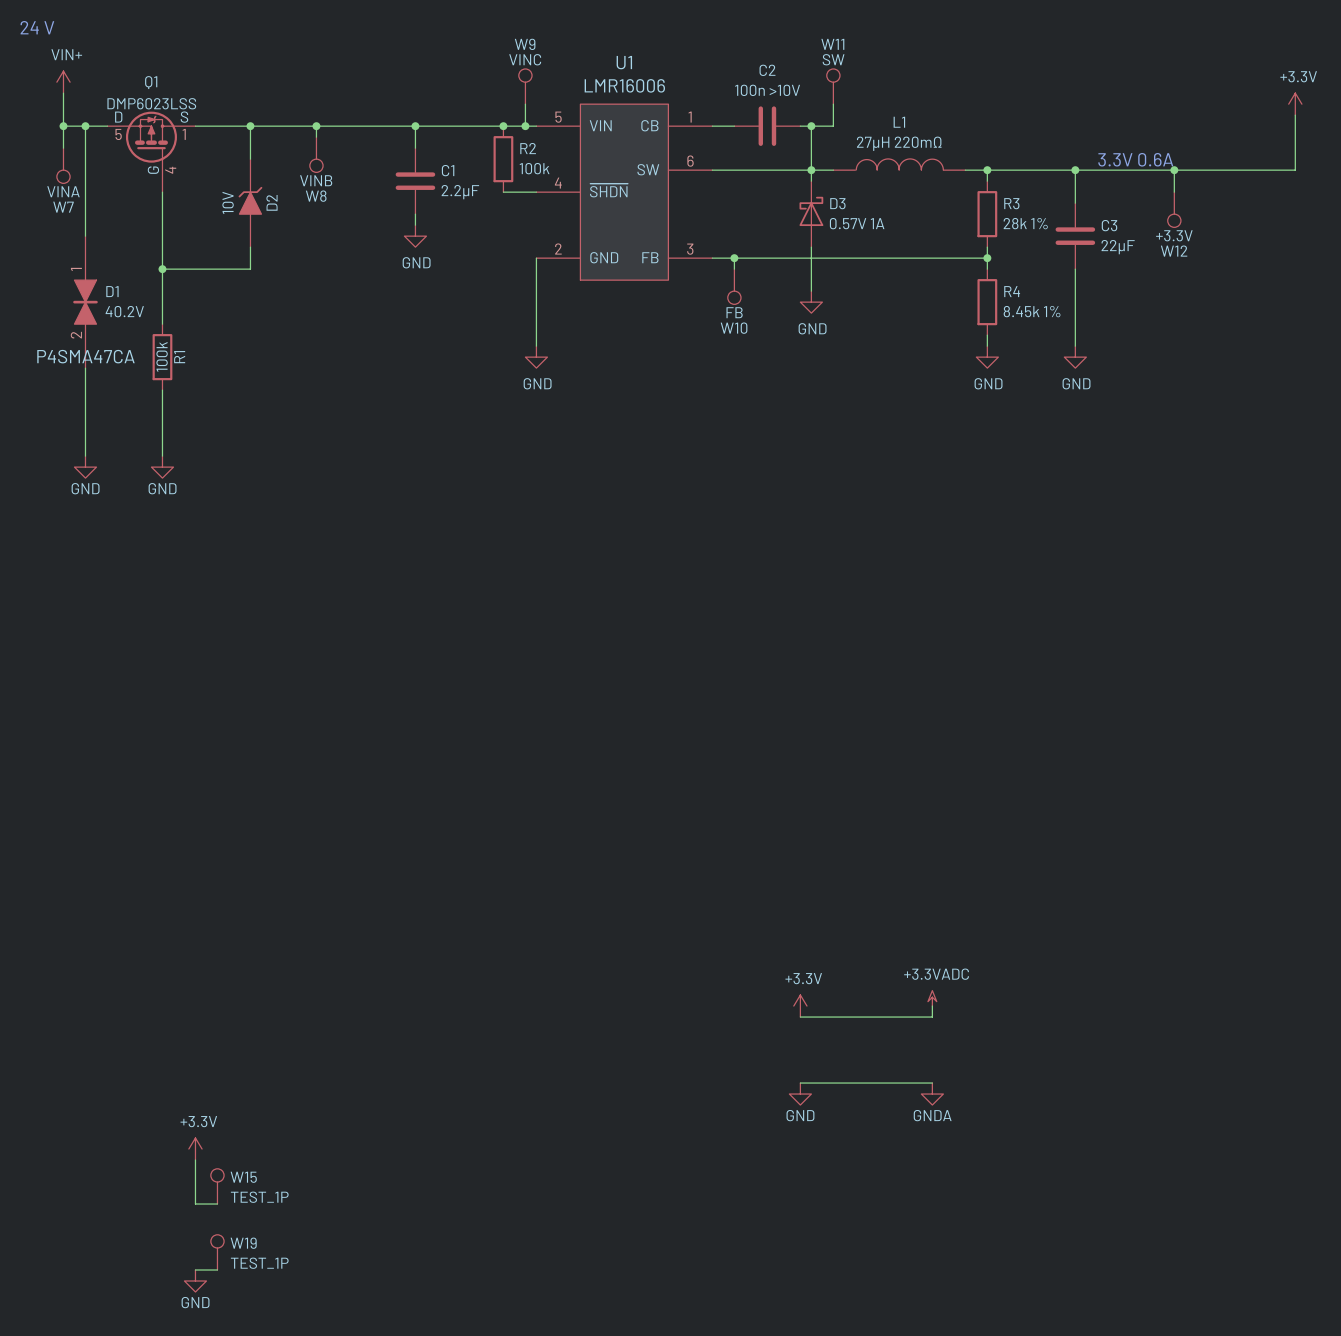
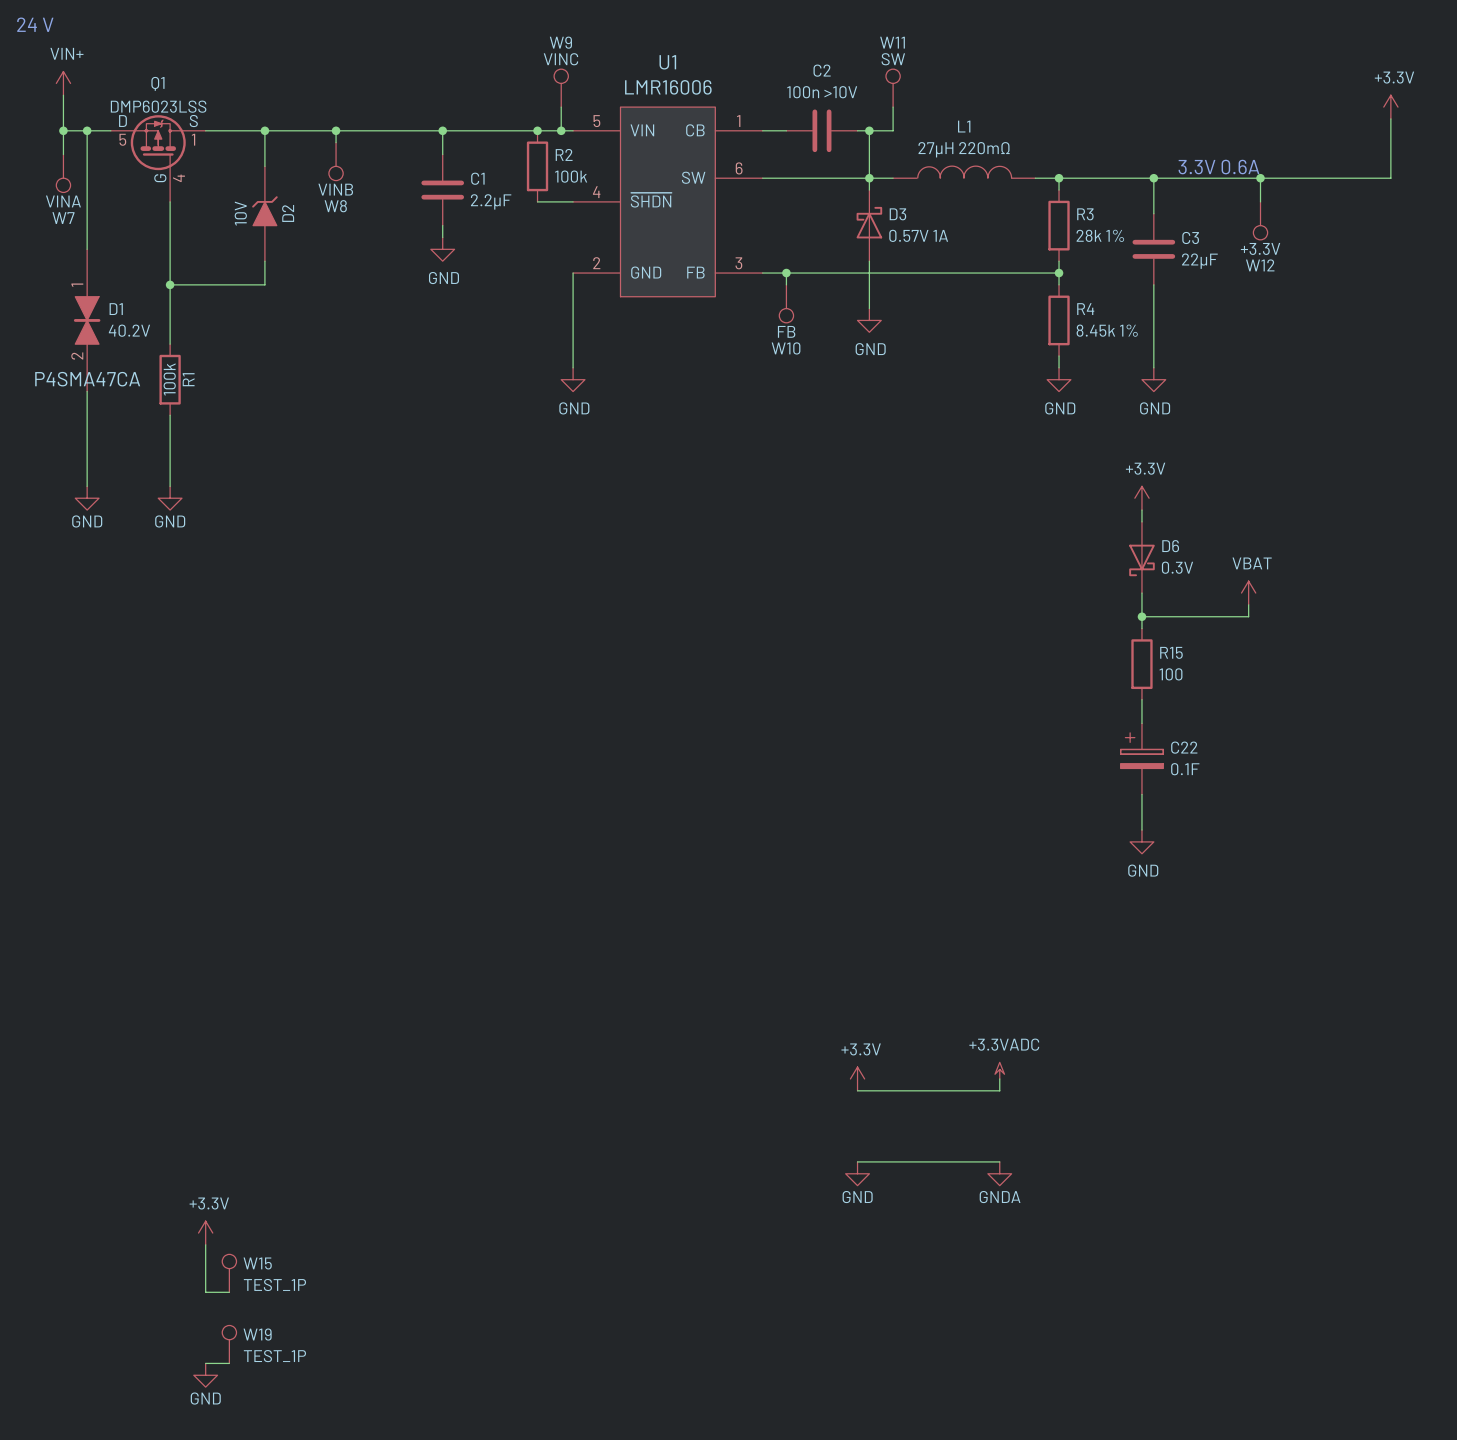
power symbol: none -> +3.3V (1141, 498)
wire: none -> (1141, 510) (1141, 521)
D6: none -> 0.3V (1141, 557)
wire: none -> (1141, 593) (1141, 628)
power symbol: none -> VBAT (1248, 593)
wire: none -> (1248, 604) (1248, 616) (1141, 616)
junction: none -> (1141, 616)
R15: none -> 100 (1141, 664)
wire: none -> (1141, 699) (1141, 723)
C22: none -> 0.1F (1141, 758)
wire: none -> (1141, 794) (1141, 830)
power symbol: none -> GND (1141, 841)

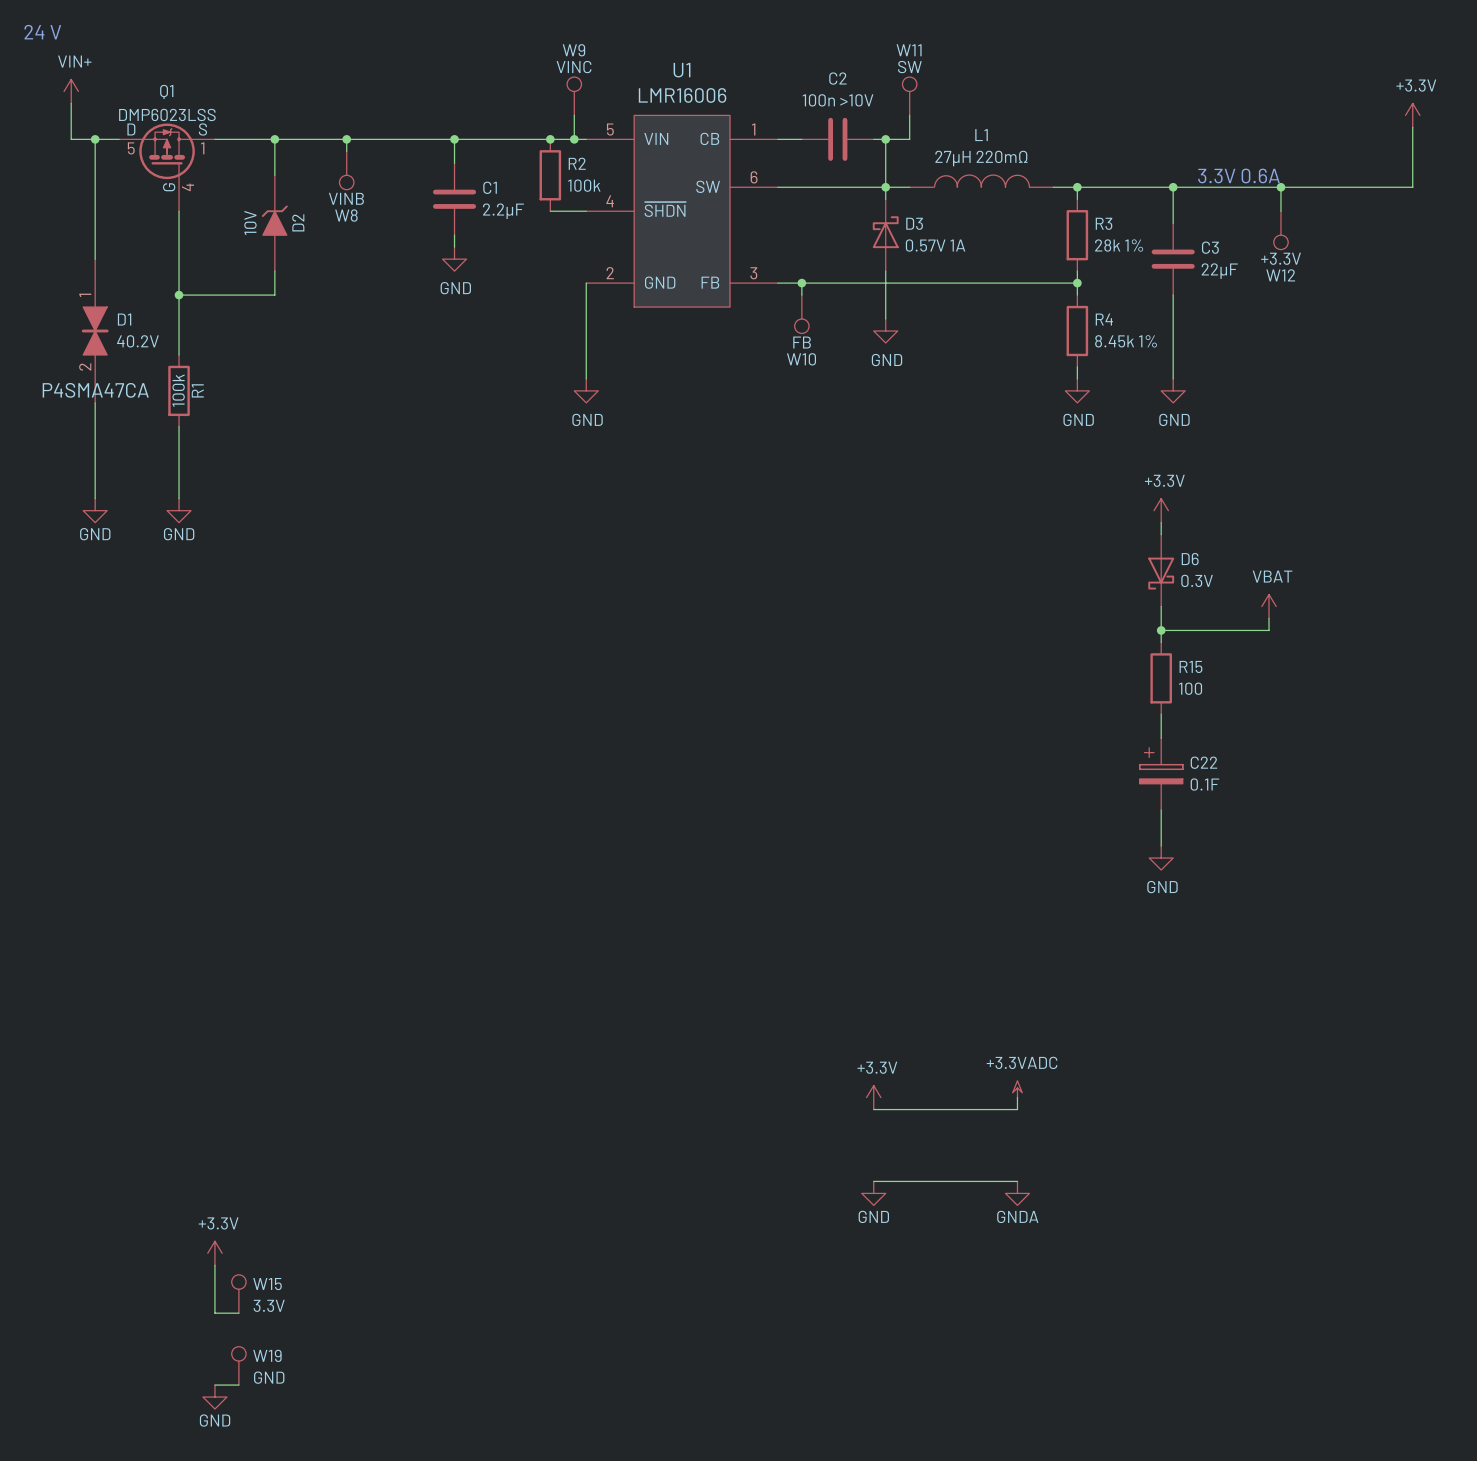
wire: (63, 130) (63, 154) -> none
junction: (63, 130) -> none
W7: VINA (63, 173) -> none
W15 value: TEST_1P (274, 1284) -> 3.3V (269, 1305)
W19 value: TEST_1P (274, 1356) -> GND (269, 1377)

